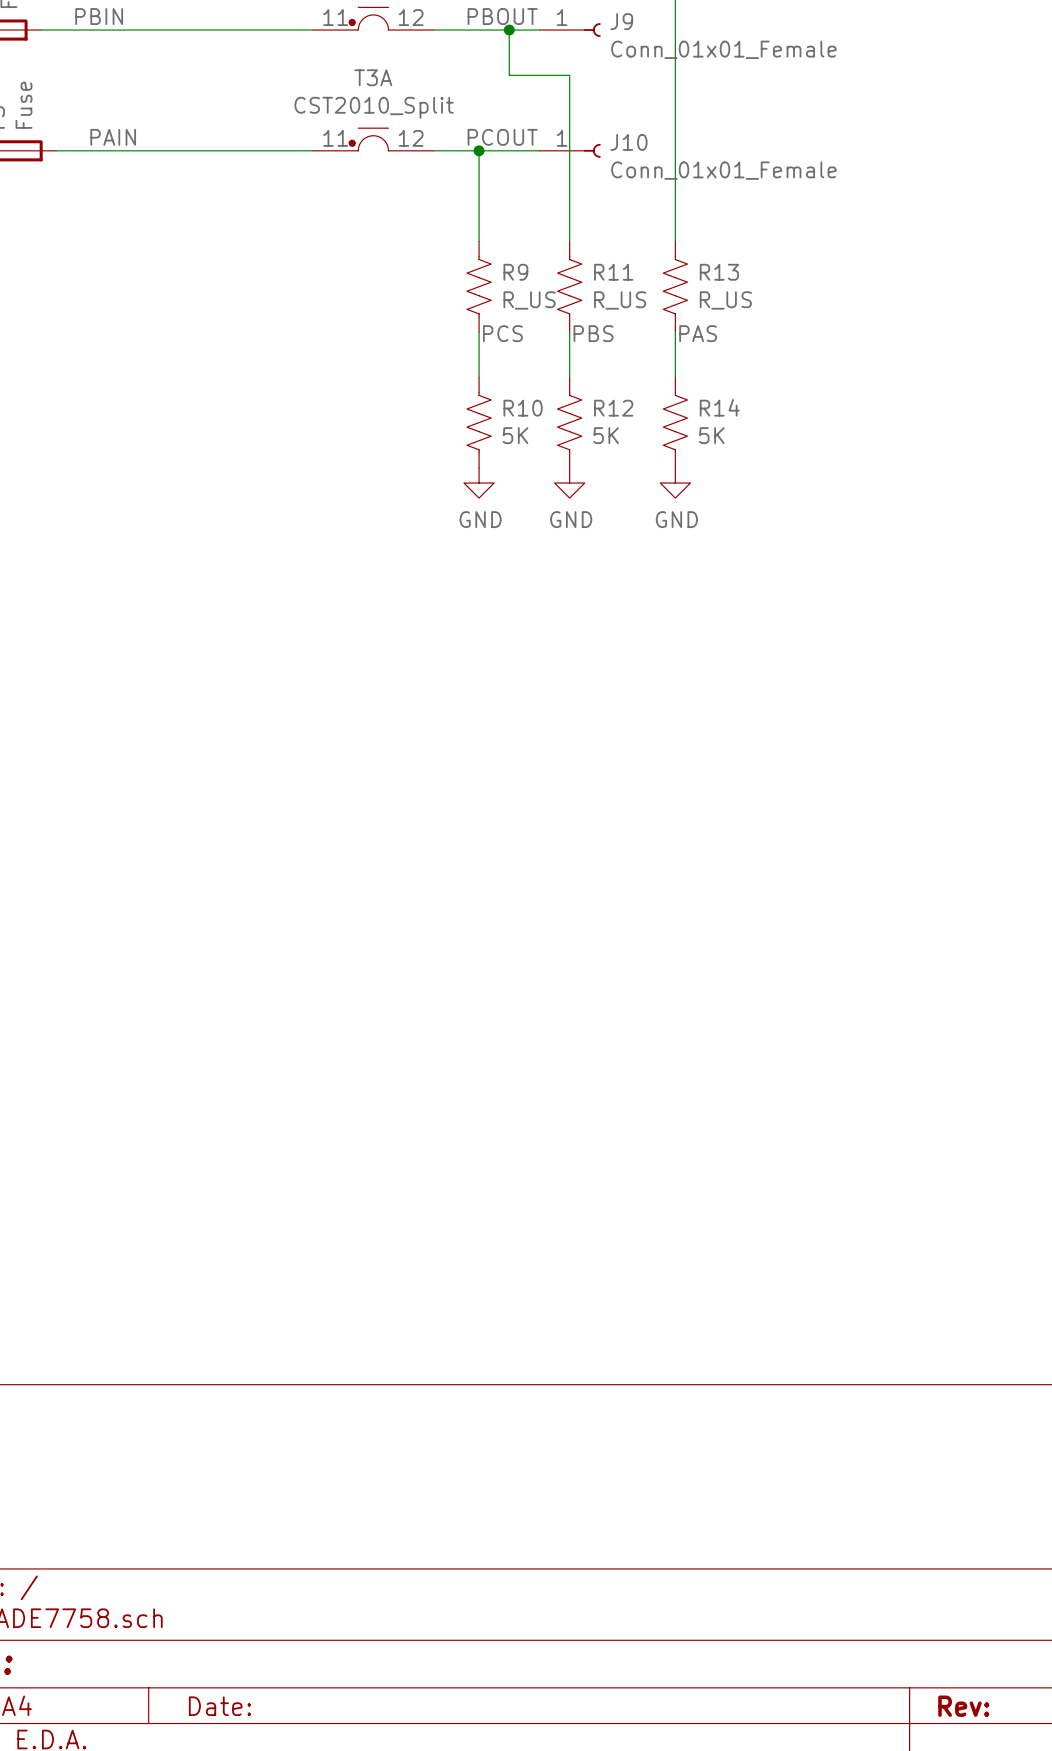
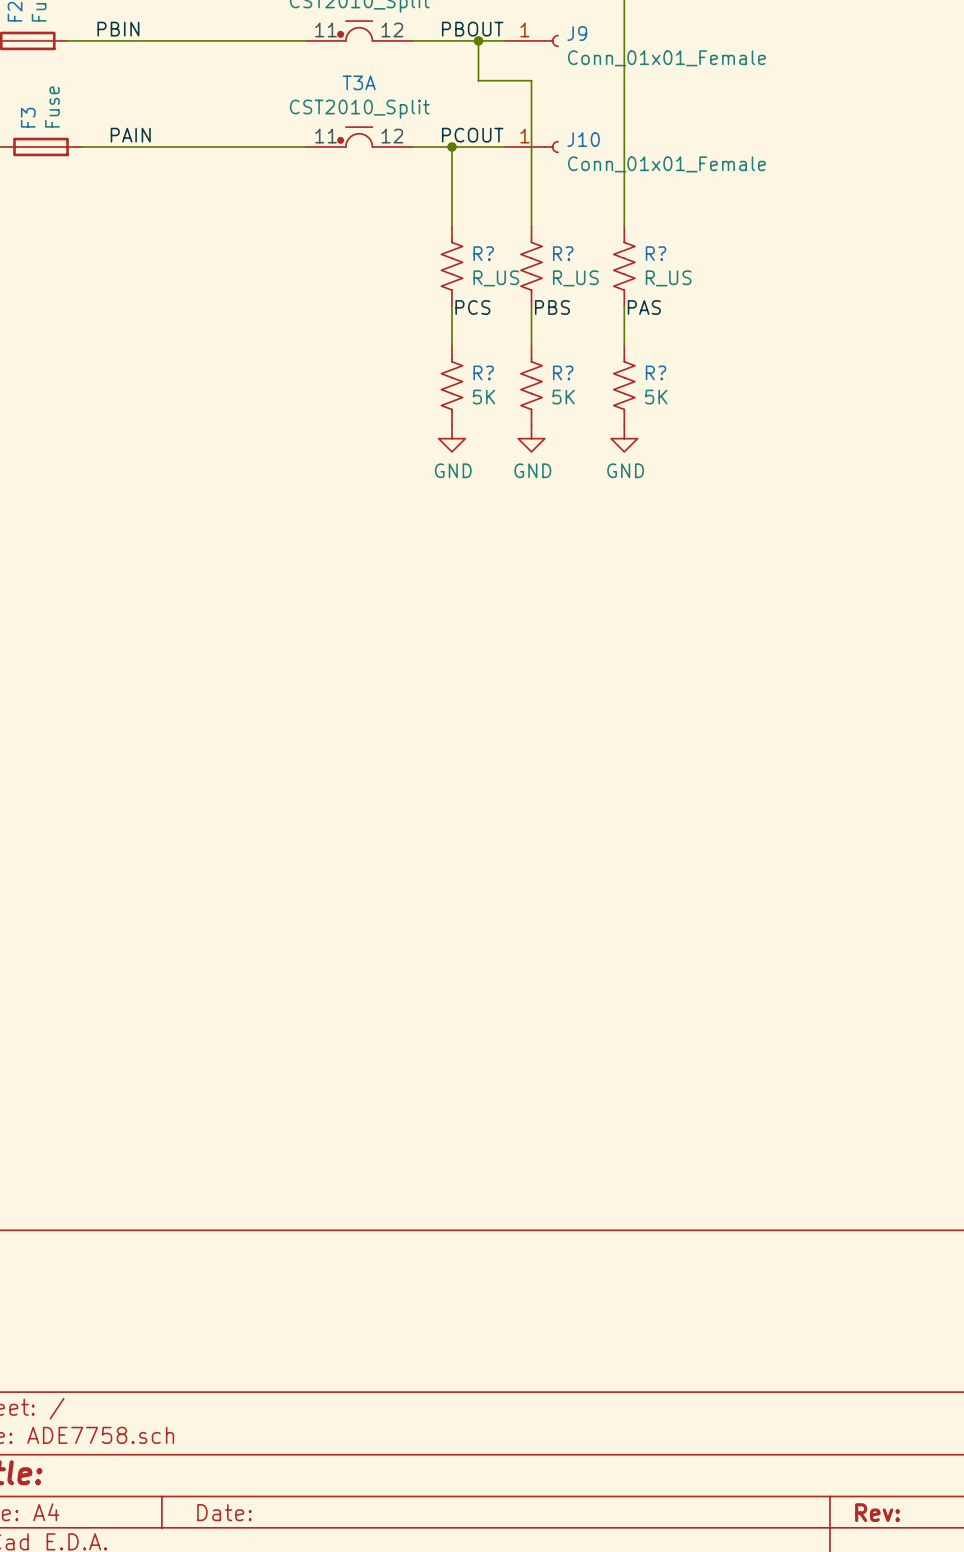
R9 name: R9 (515, 272) -> R? (483, 253)
R11 name: R11 (613, 272) -> R? (563, 253)
R13 name: R13 (719, 272) -> R? (656, 253)
R14 name: R14 (719, 407) -> R? (656, 372)
R10 name: R10 (523, 408) -> R? (483, 372)
R12 name: R12 (613, 408) -> R? (563, 372)

